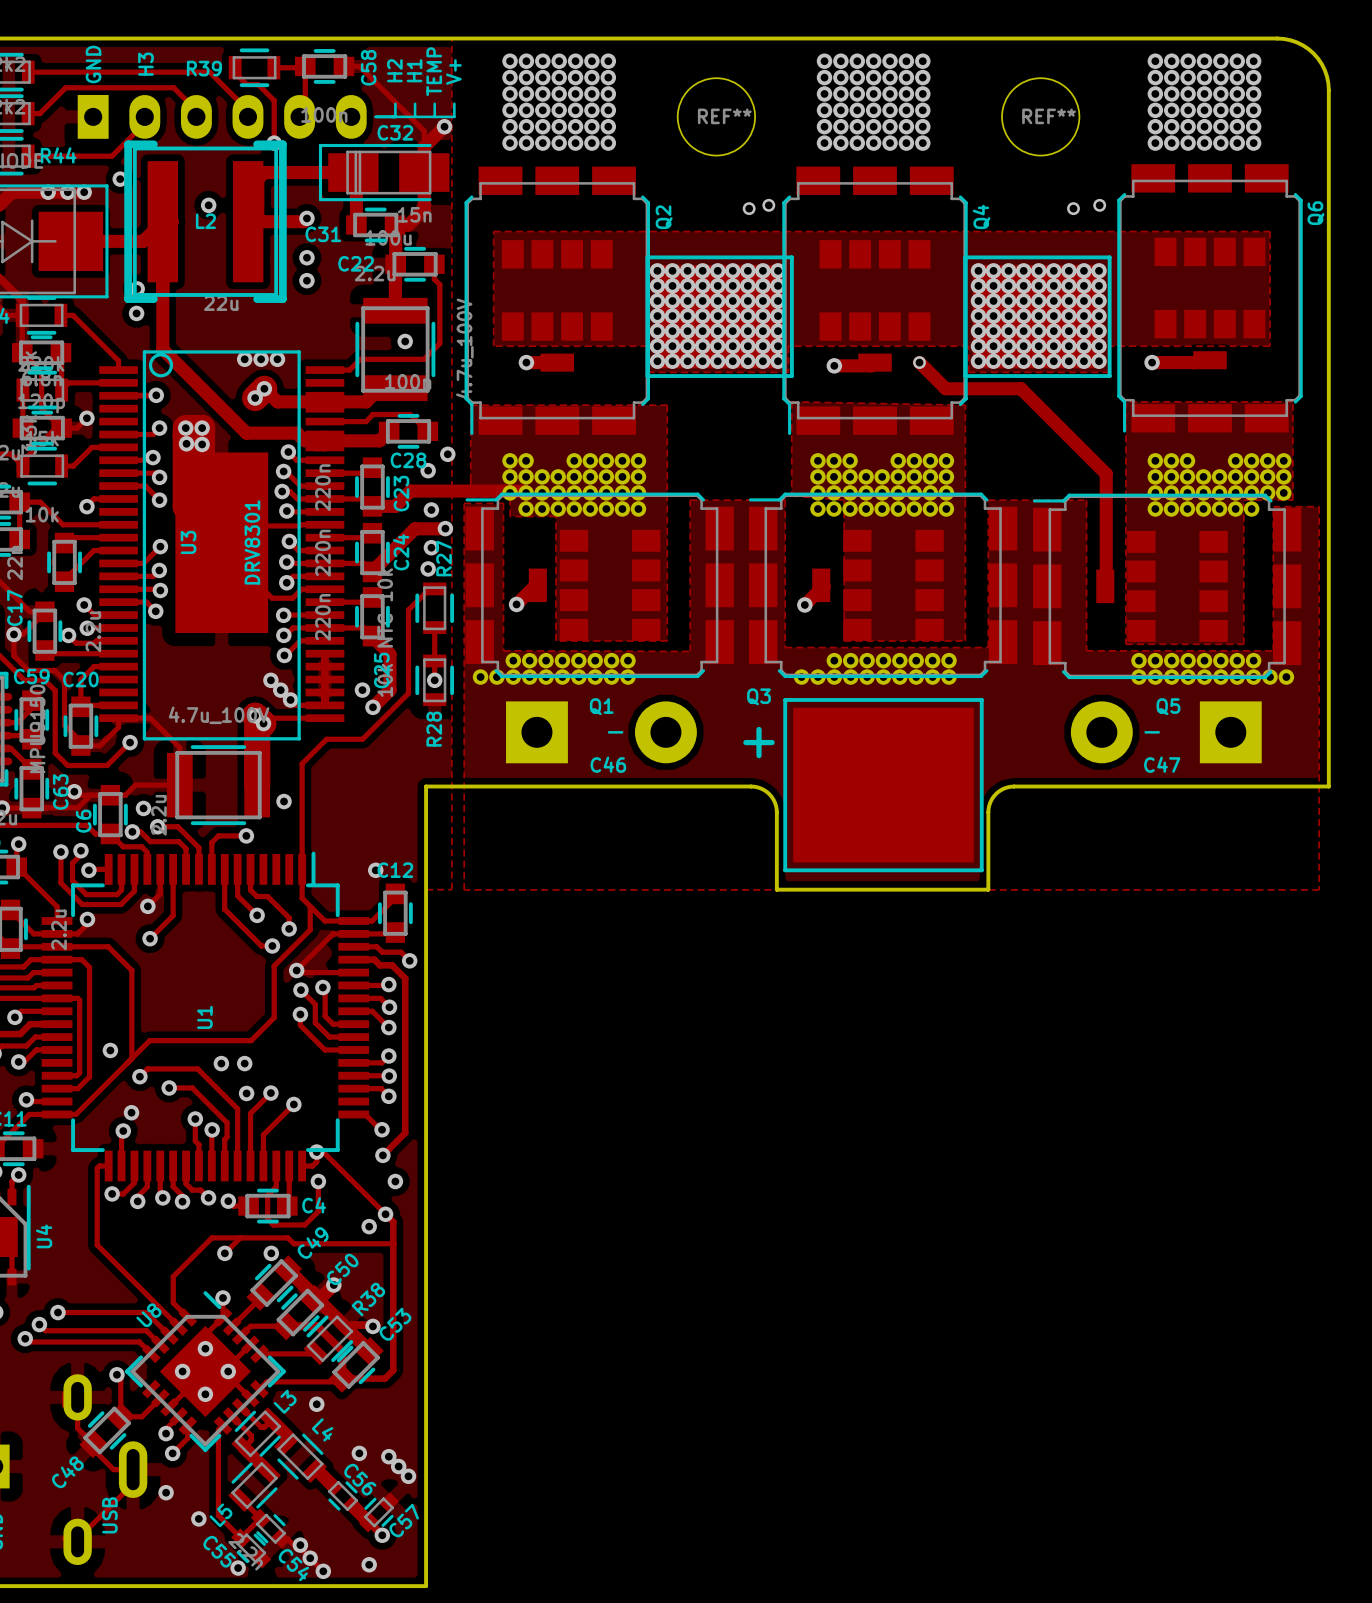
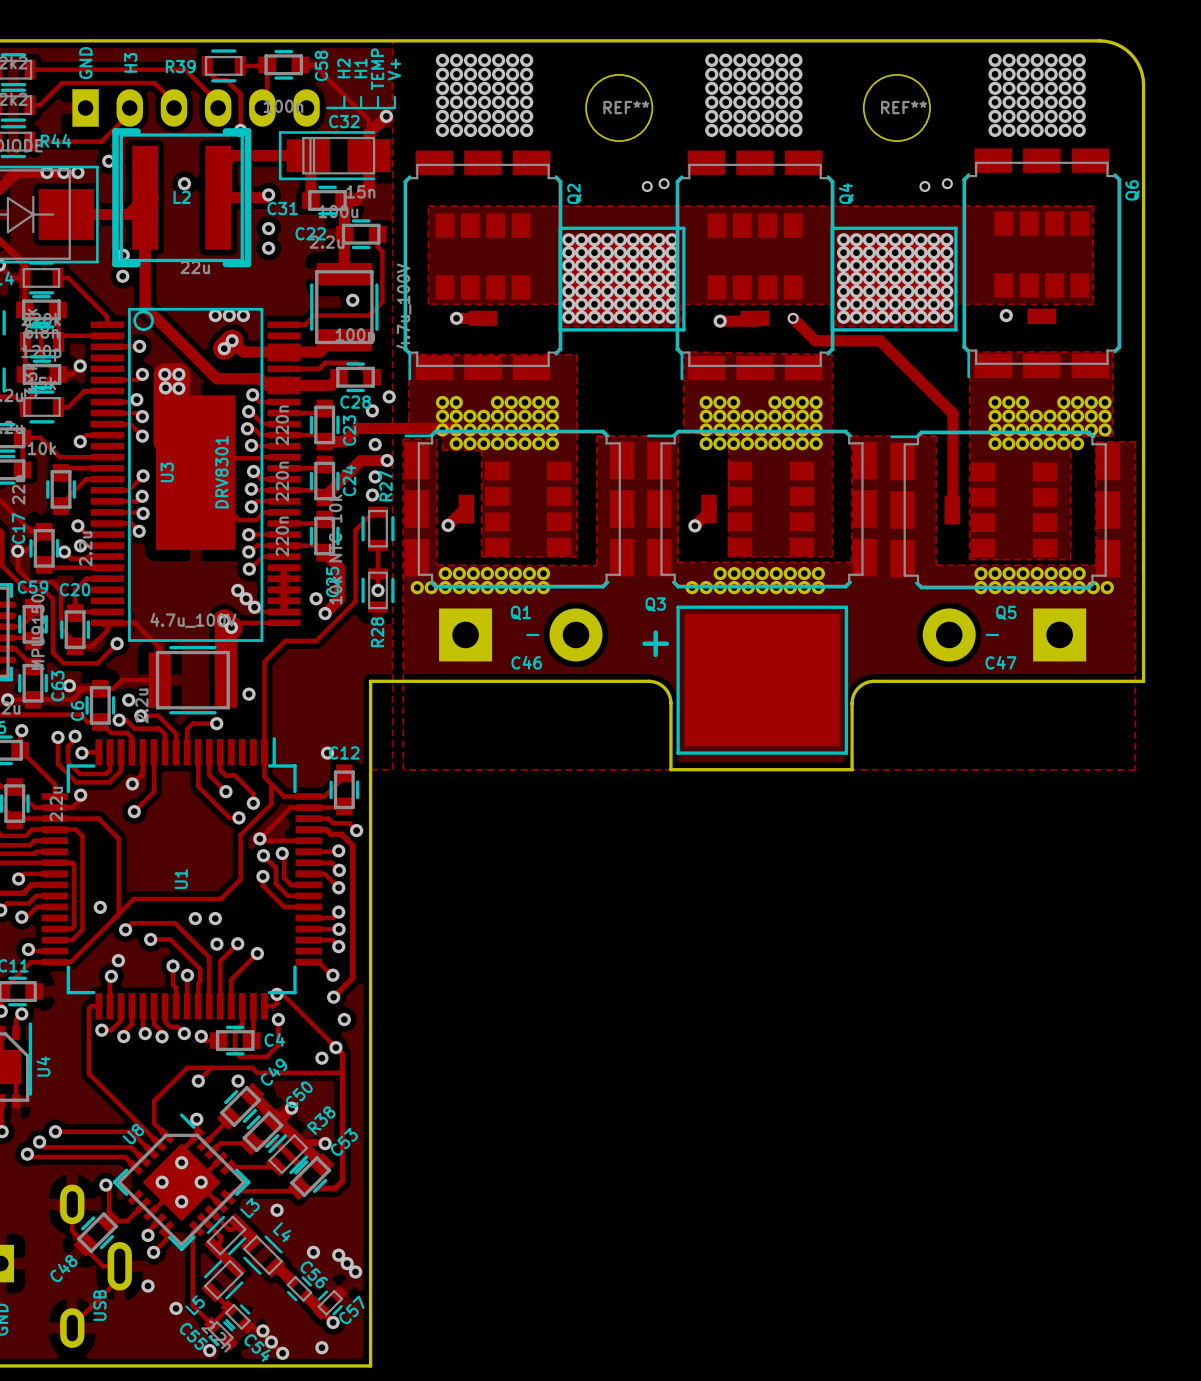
track: (1152, 362) (1193, 362) -> none
via position: (1152, 362) -> (1006, 315)

